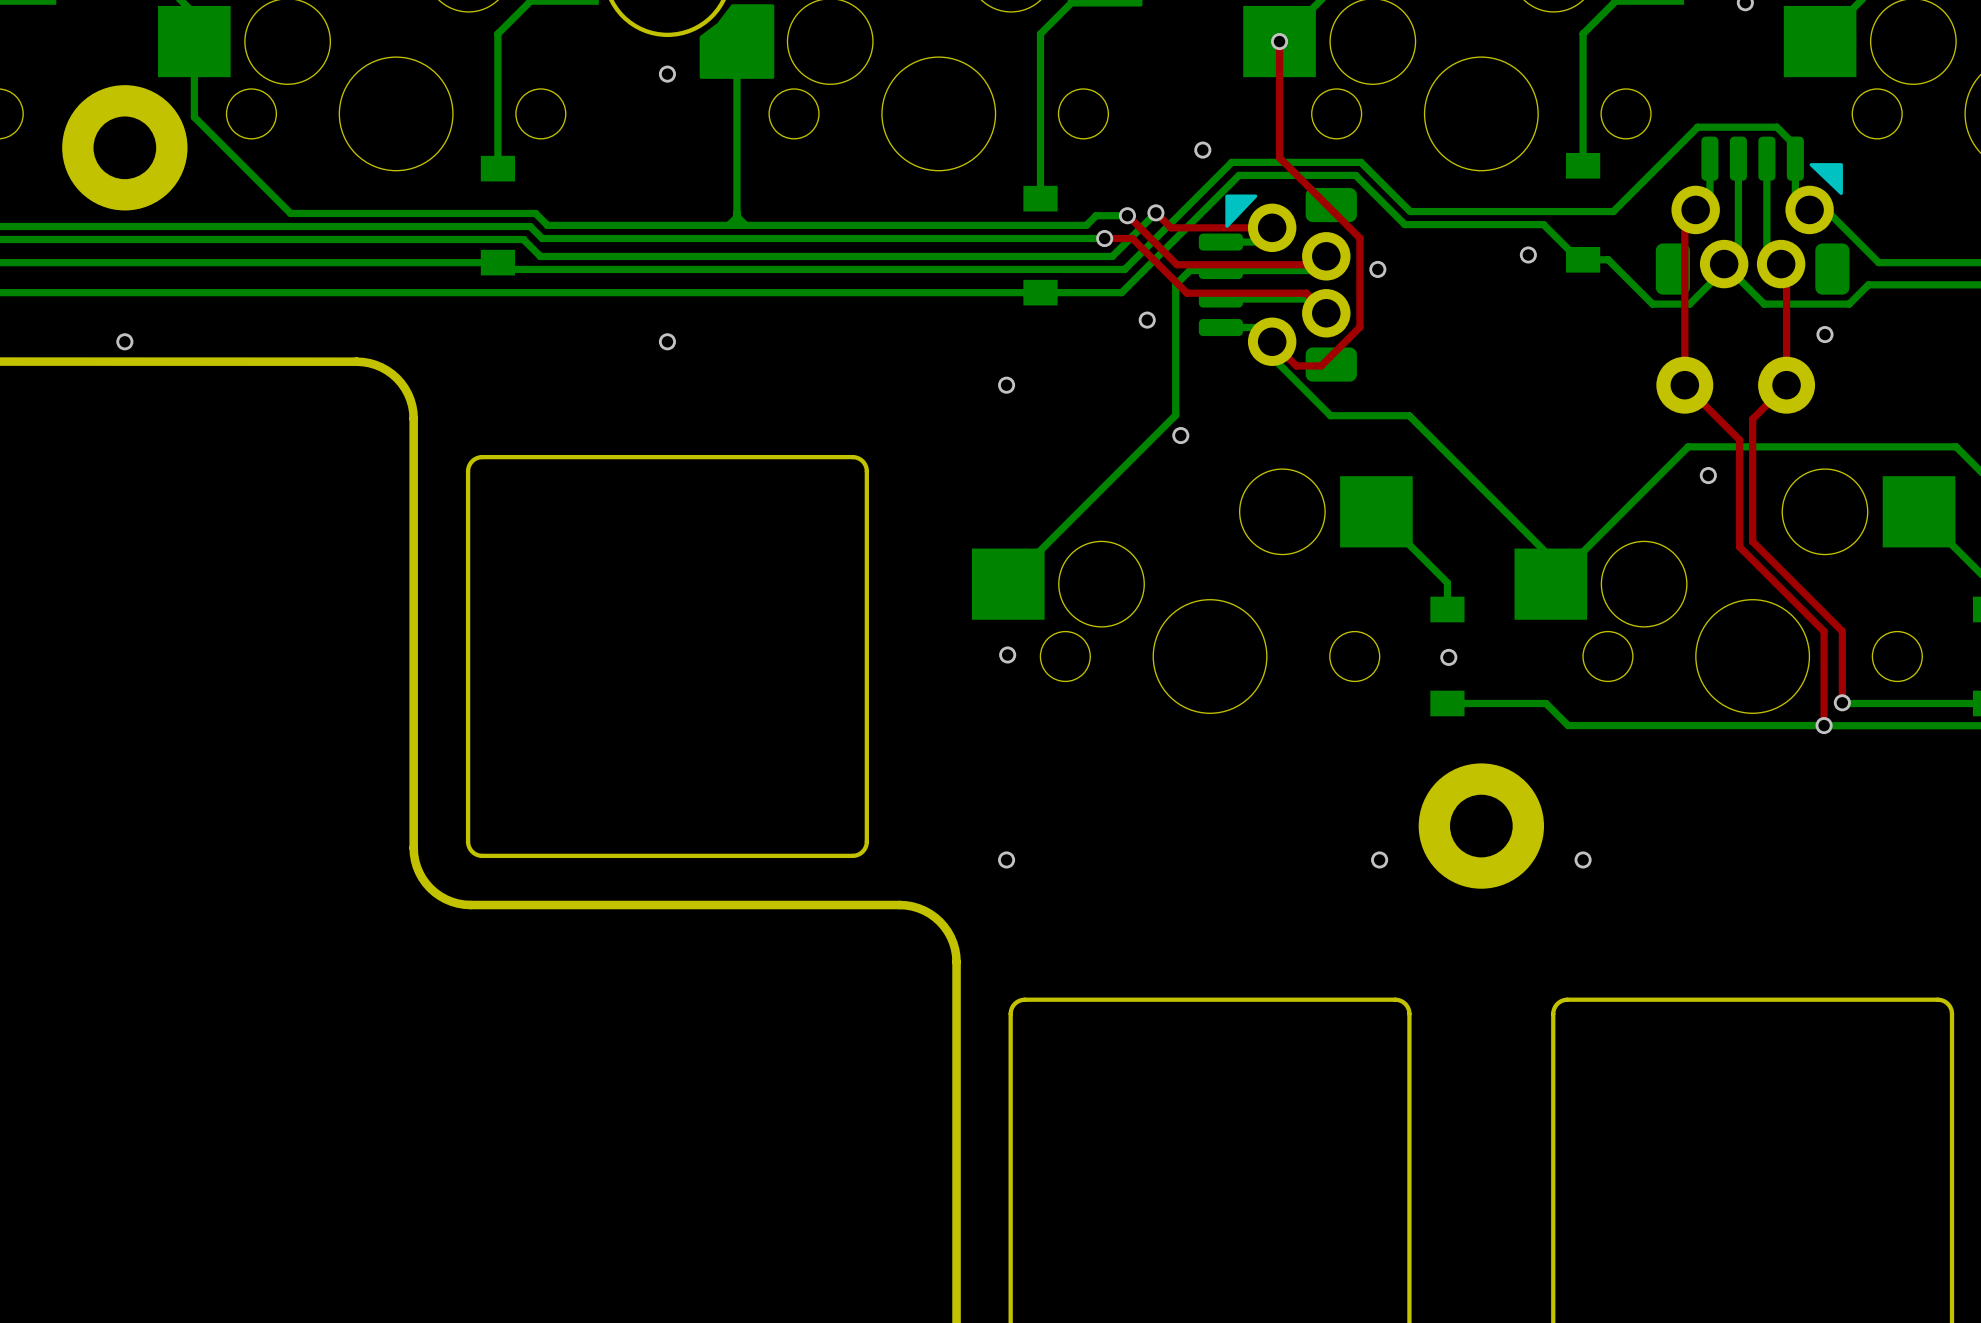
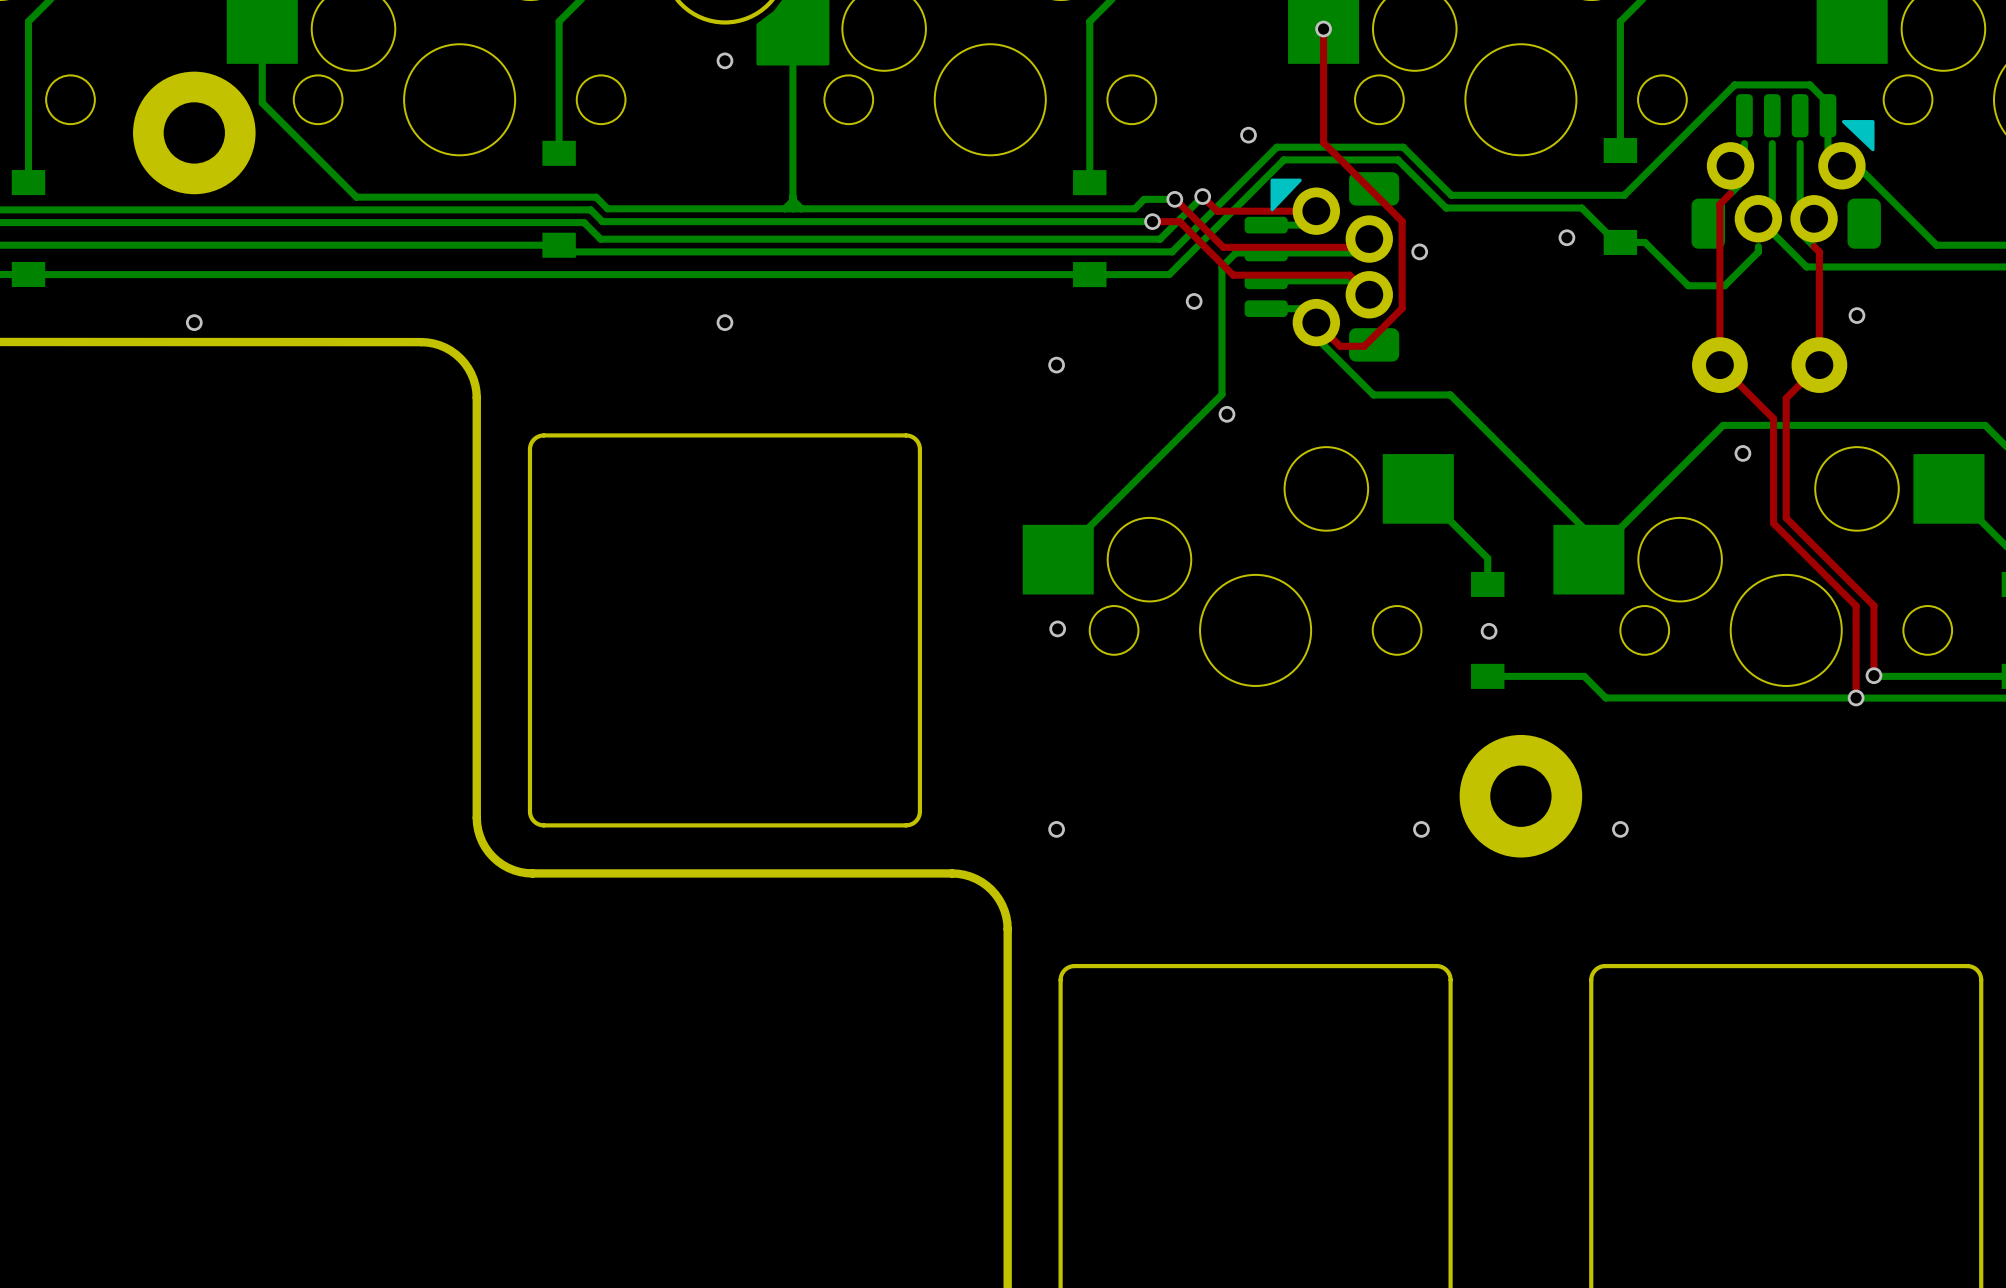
bottom track: (1795, 145) (1776, 127) (1697, 127) (1613, 211) (1587, 211) -> (1828, 130) (1828, 103) (1809, 84) (1734, 84) (1624, 195)
bottom track: (1795, 167) (1795, 195) (1809, 209) (1826, 209) (1878, 262) (1906, 262) -> (1828, 151) (1841, 165) (1857, 165) (1936, 245)
part position: (1752, 215) -> (1786, 171)
bottom track: (1738, 221) (1738, 249) (1724, 264) (1764, 304) (1849, 304) (1868, 284) -> (1772, 204) (1758, 218) (1806, 266) (1899, 266)

